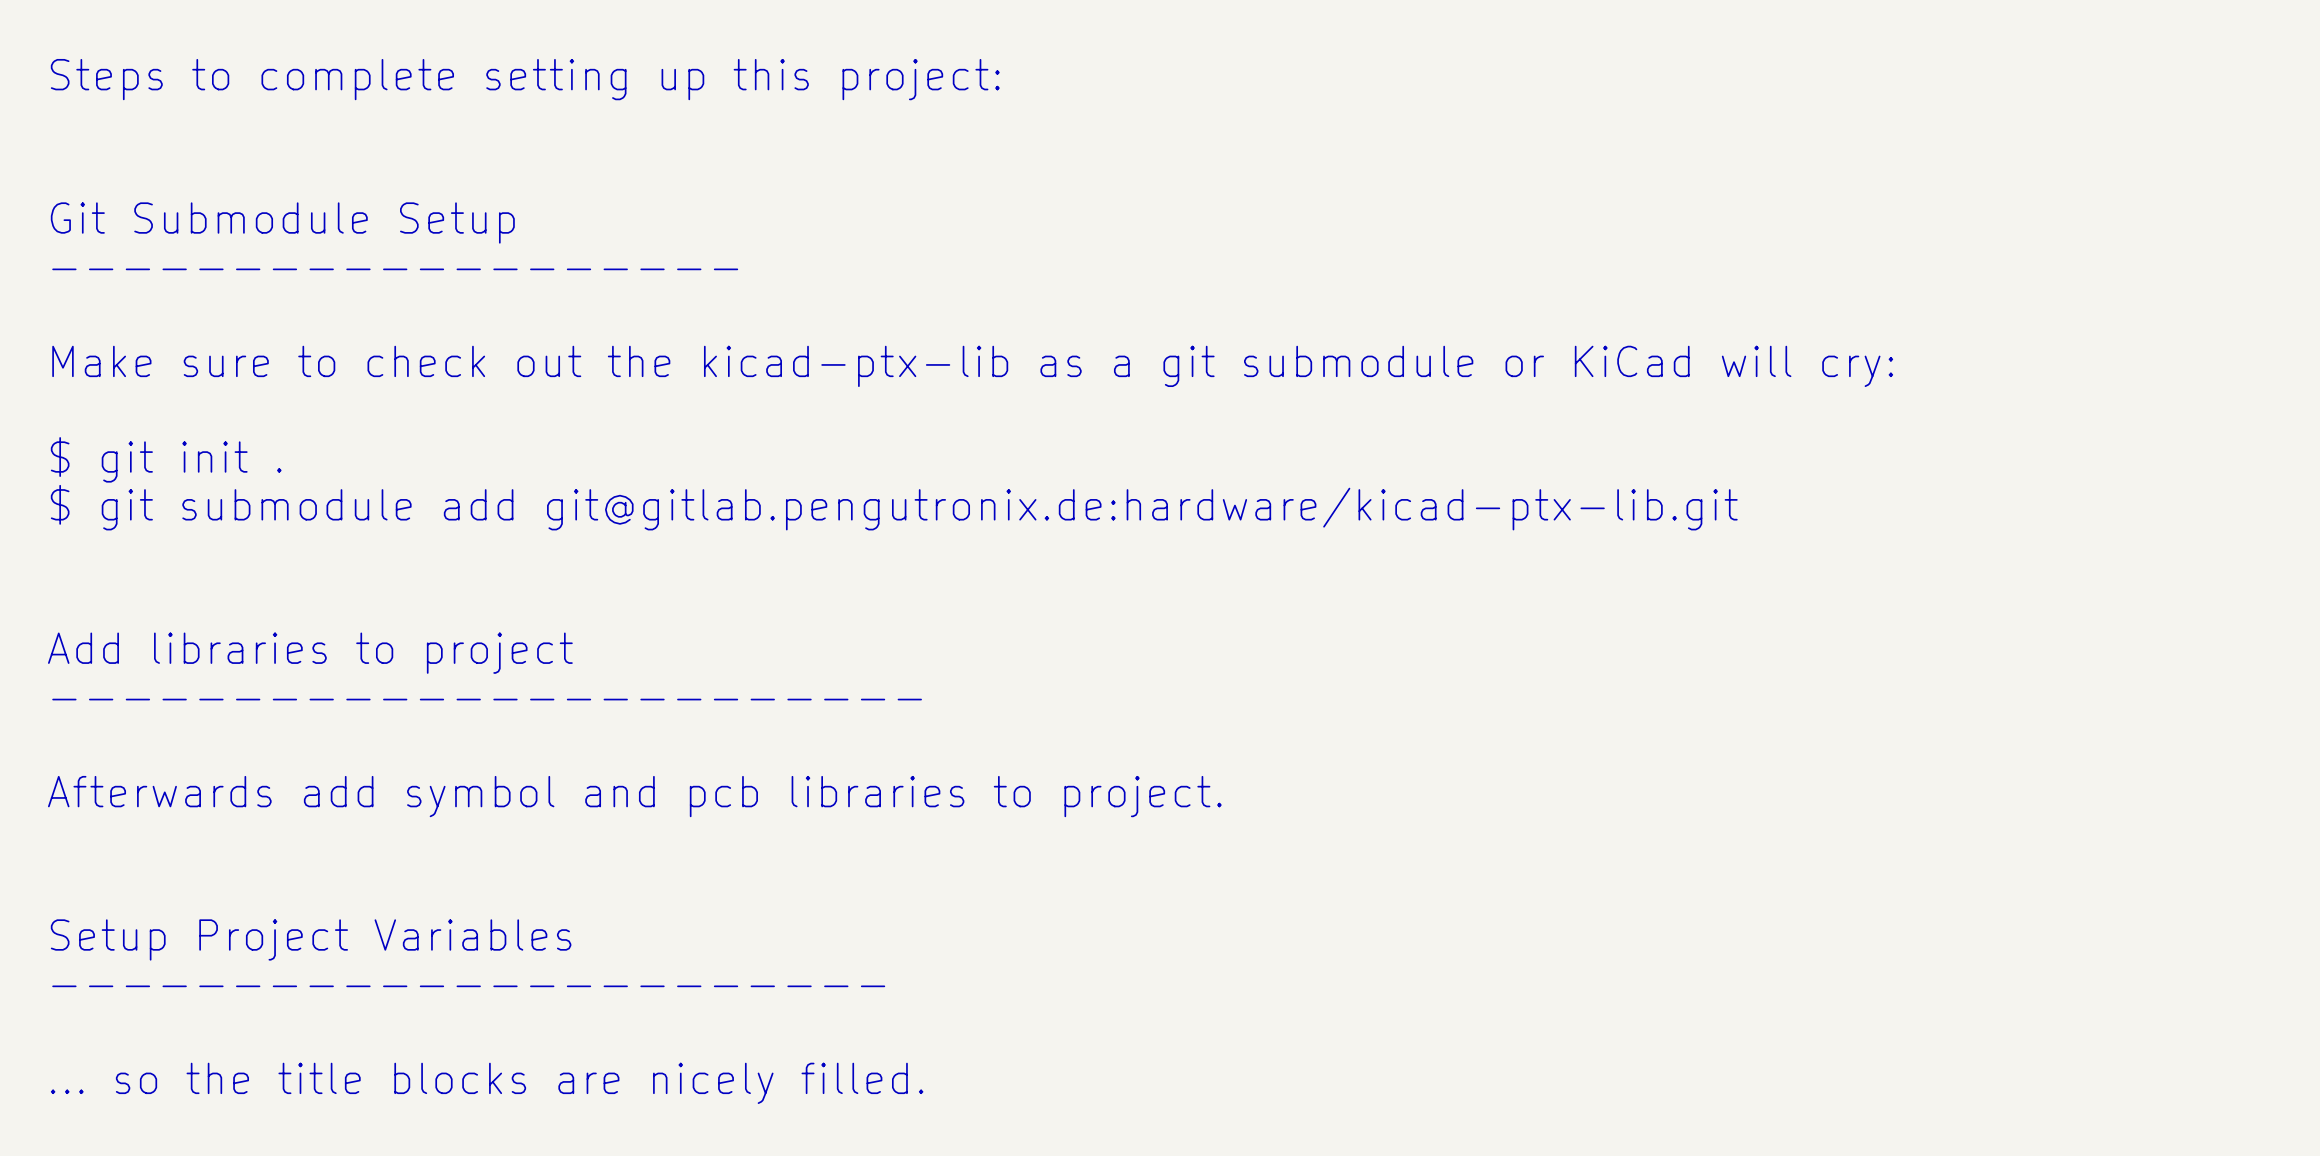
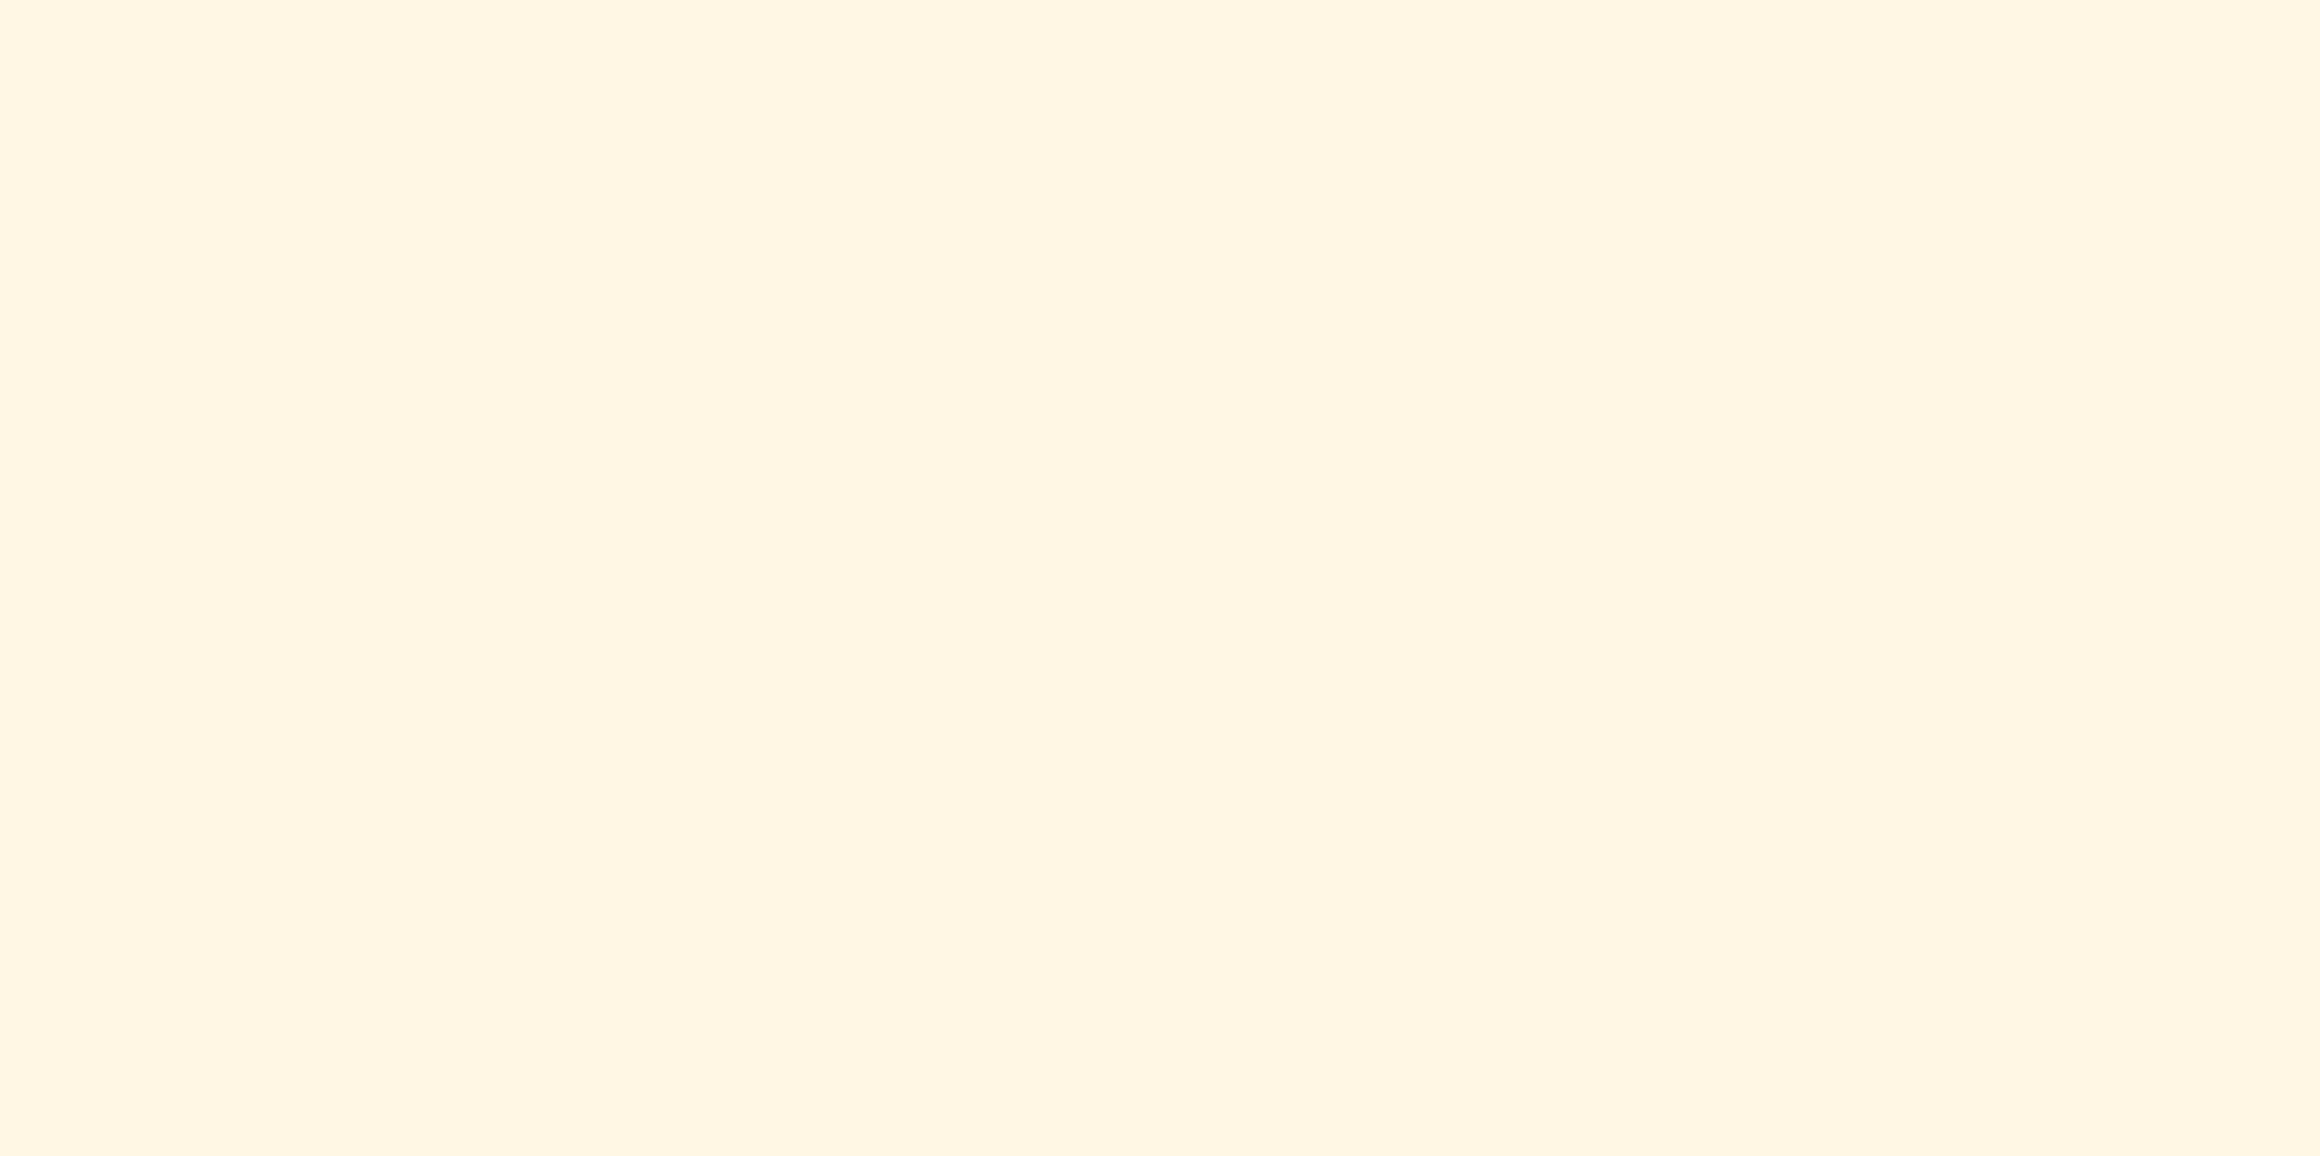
text: Steps to complete setting up this project: (525, 79) -> none
text: Git Submodule Setup (282, 222) -> none
text: ------------------- (395, 269) -> none
text: Make sure to check out the kicad-ptx-lib as a git submodule or KiCad will cry: (972, 366) -> none
text: $ git init . (166, 459) -> none
text: $ git submodule add git@gitlab.pengutronix.de:hardware/kicad-ptx-lib.git (894, 507) -> none
text: Add libraries to project (310, 653) -> none
text: ------------------------ (487, 699) -> none
text: Afterwards add symbol and pcb libraries to project. (634, 796) -> none
text: Setup Project Variables (311, 939) -> none
text: ----------------------- (468, 986) -> none
text: ... so the title blocks are nicely filled. (487, 1083) -> none

